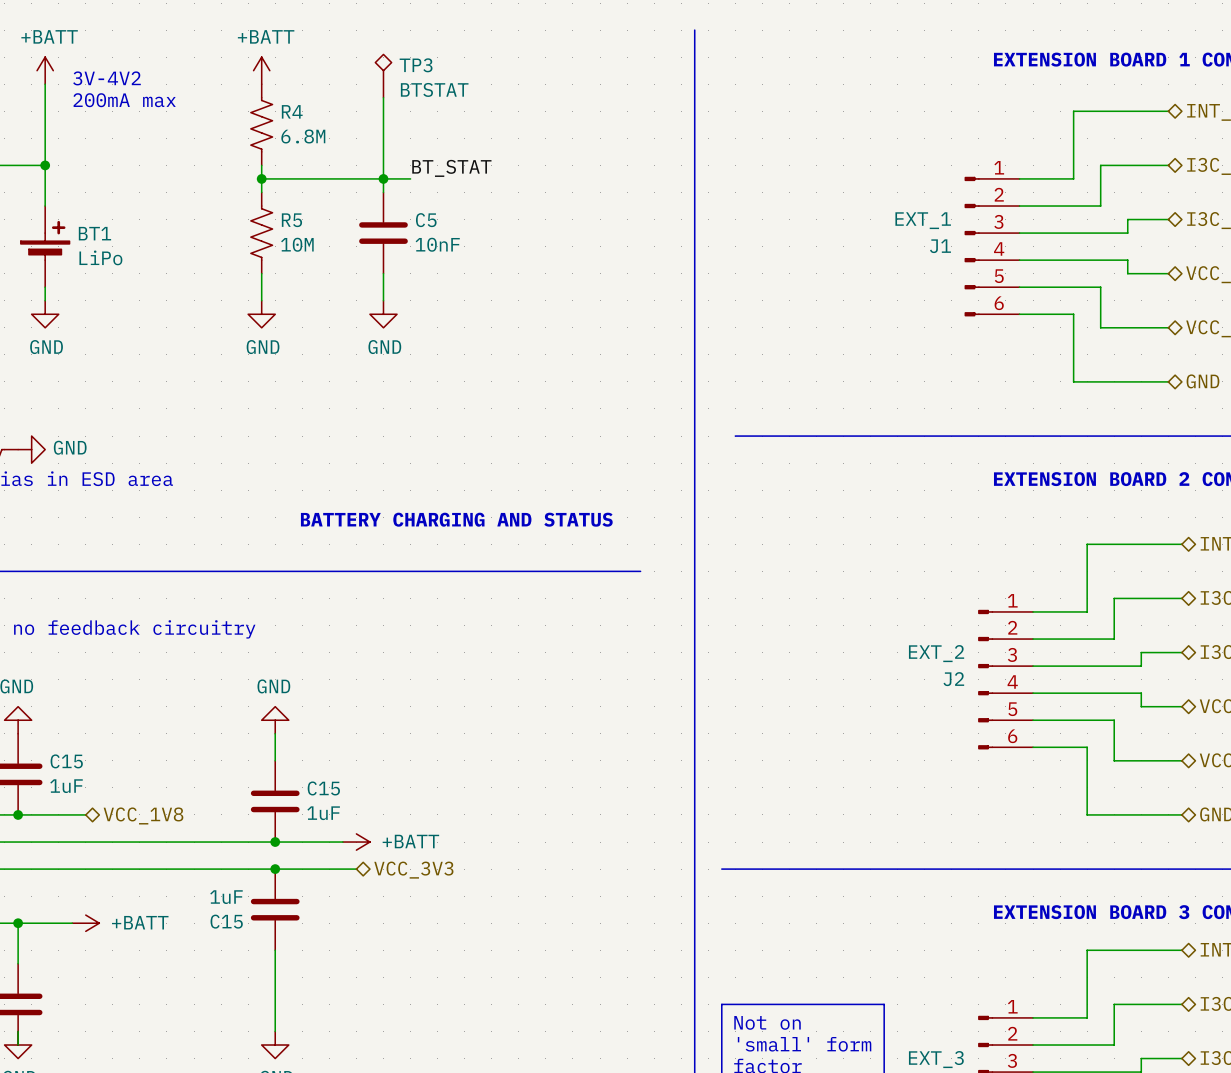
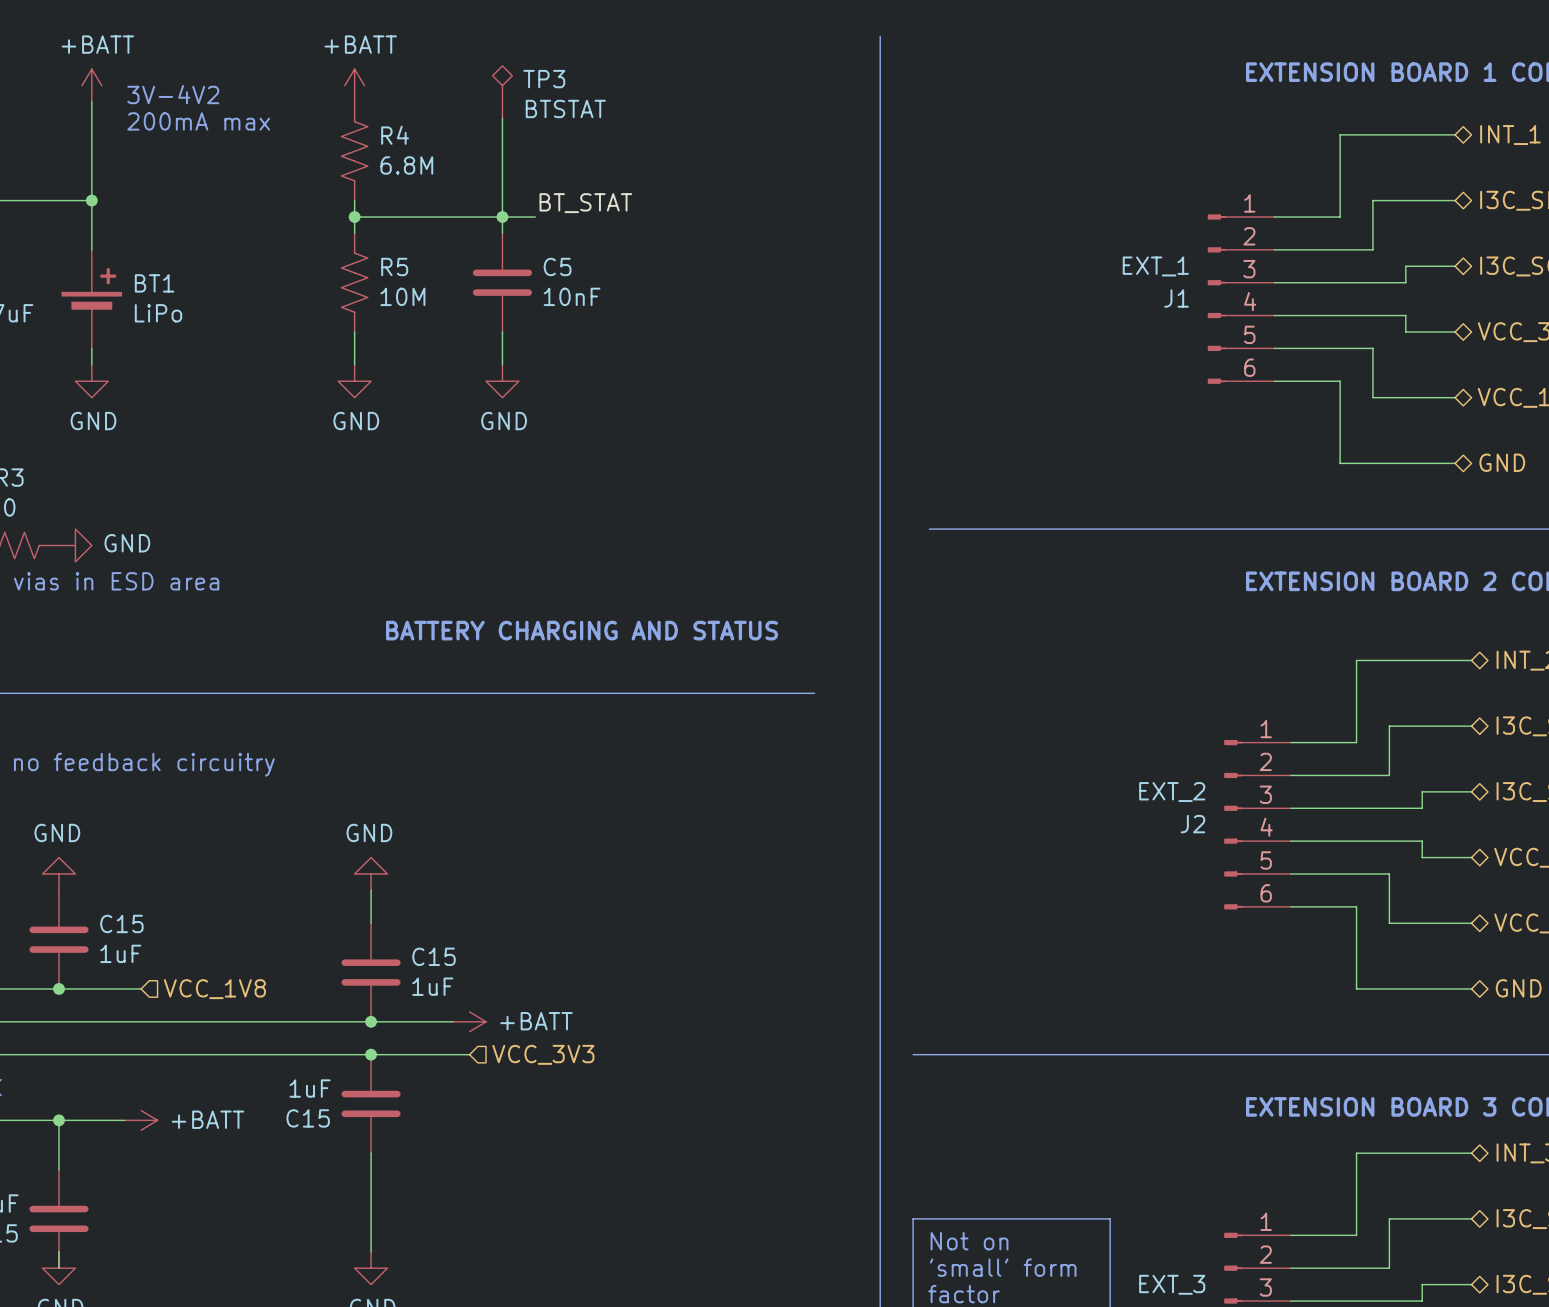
hierarchical label shape: bidirectional (143, 815) -> input (214, 989)
hierarchical label shape: bidirectional (413, 870) -> input (543, 1054)

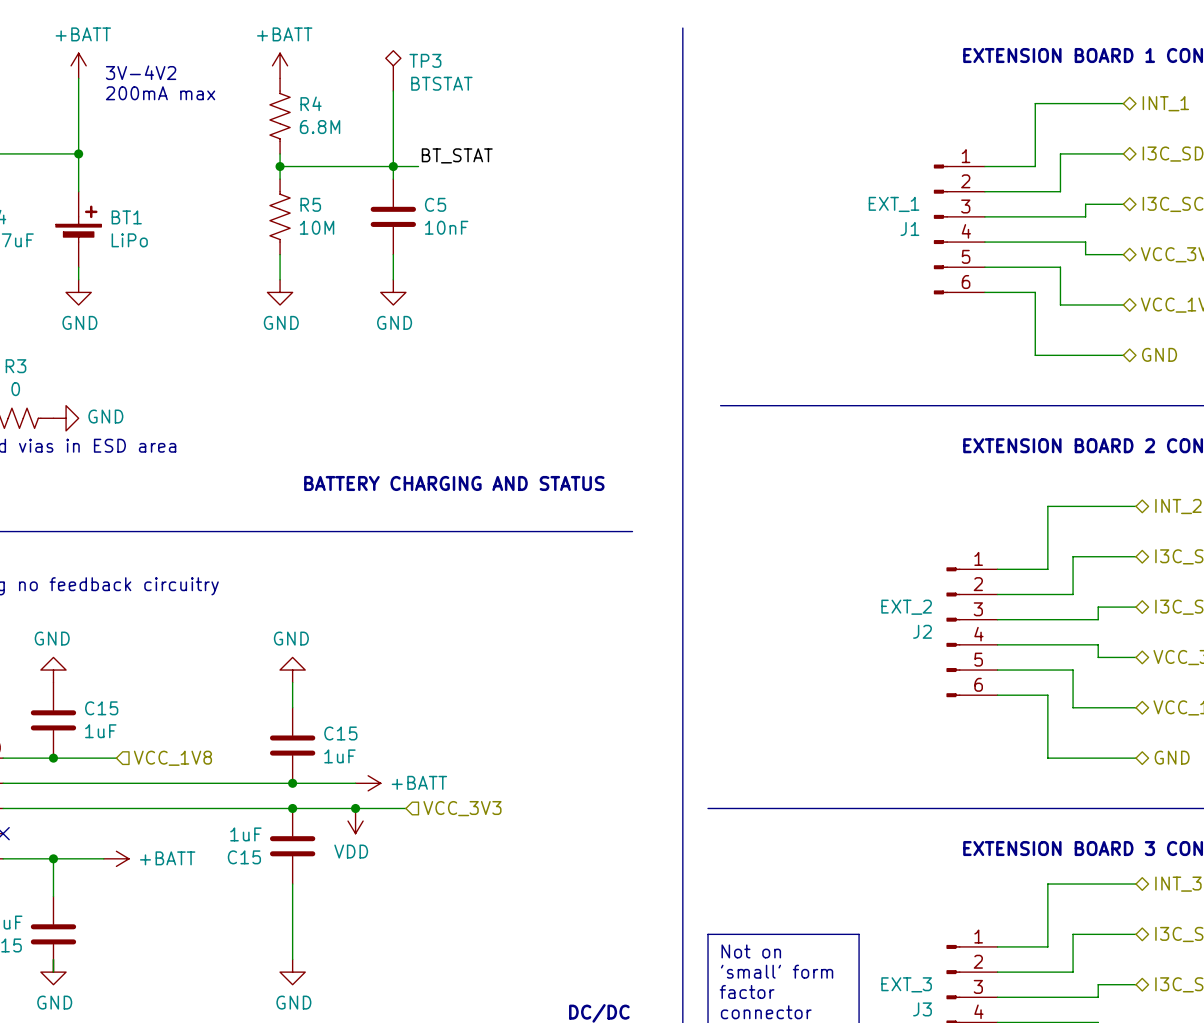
junction: none -> (355, 808)
wire: none -> (368, 808) (405, 808)
hierarchical label position: VCC_3V3 (543, 1054) -> VCC_3V3 (462, 808)
power symbol: none -> VDD (355, 821)

